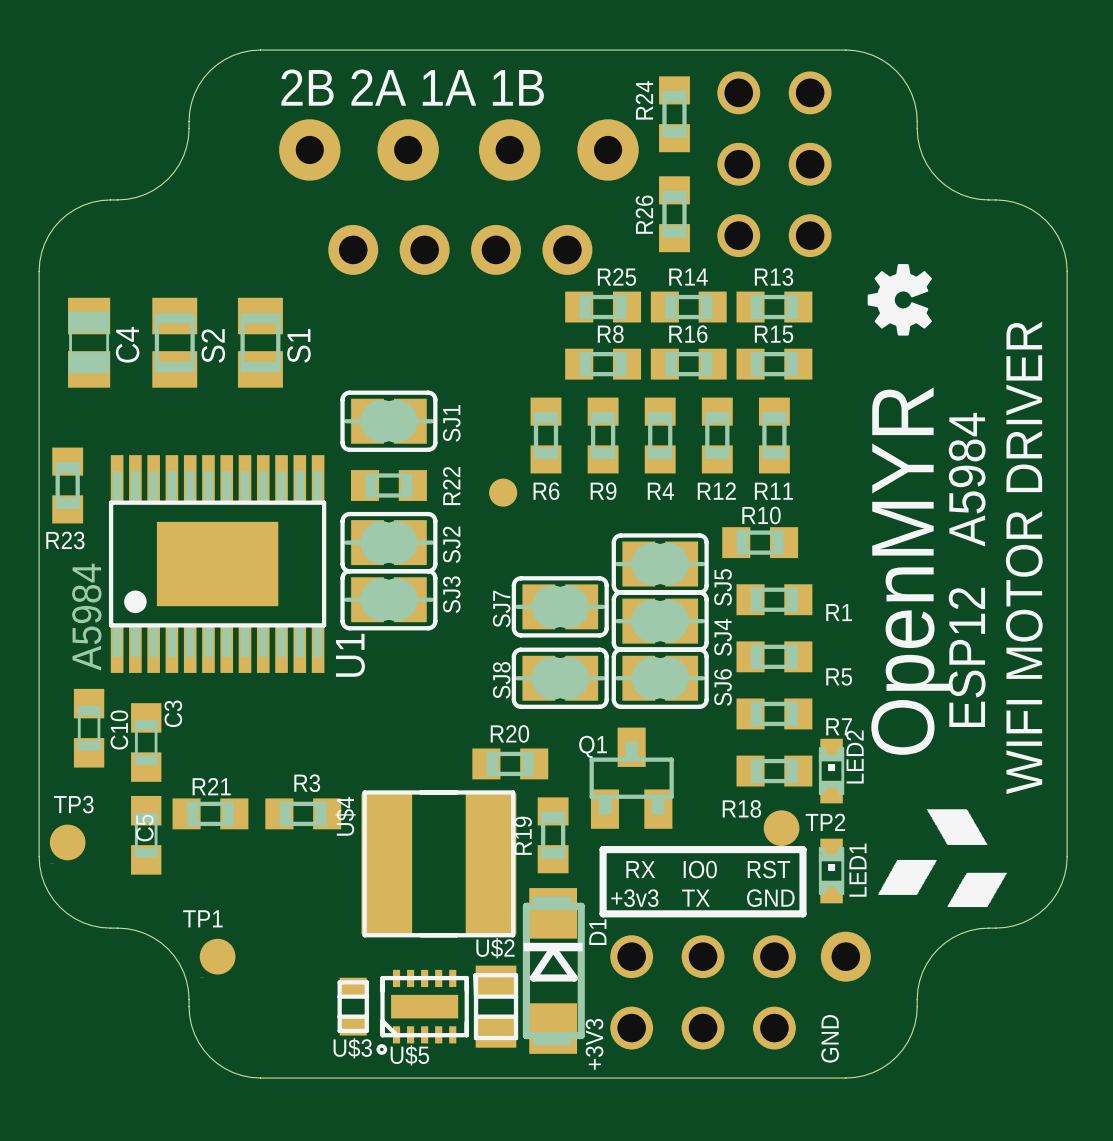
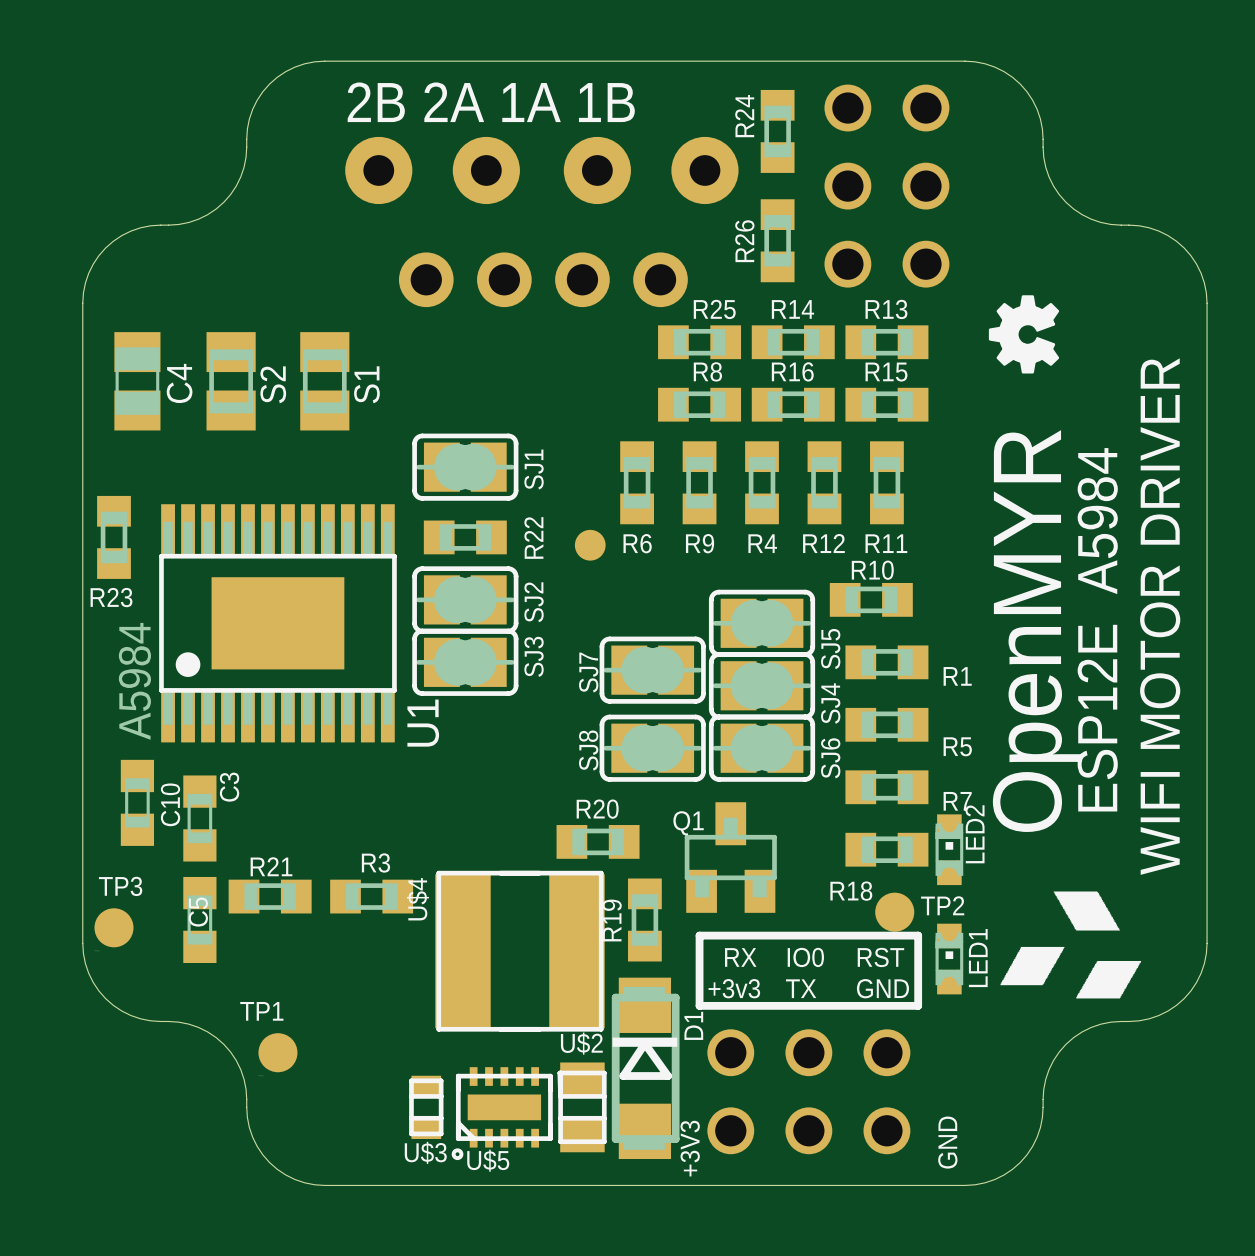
text: ESP12 A5984 (967, 569) -> ESP12E A5984 (1097, 629)
part: (845, 956) -> none

